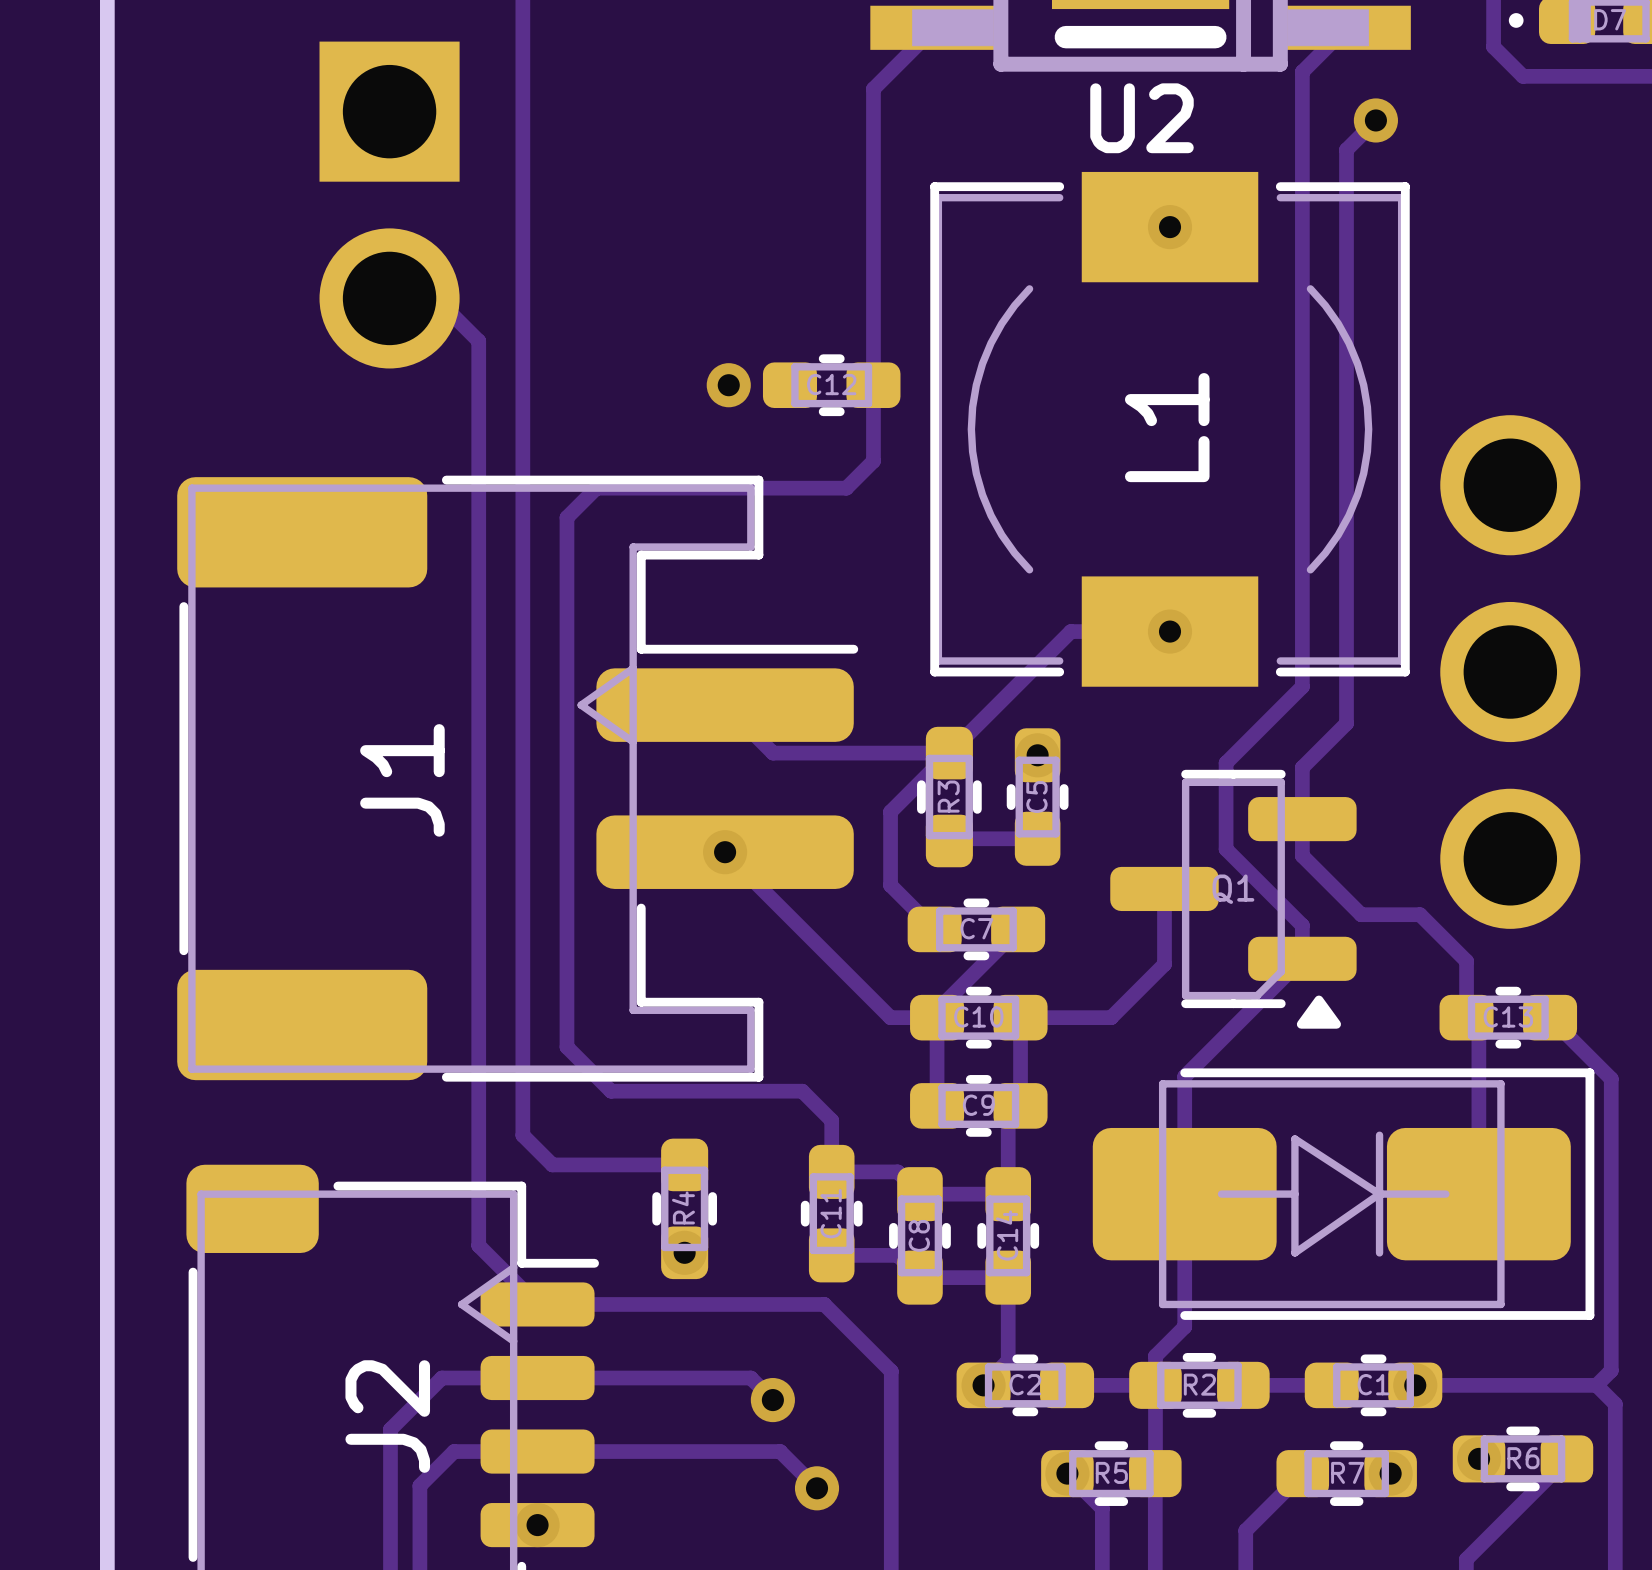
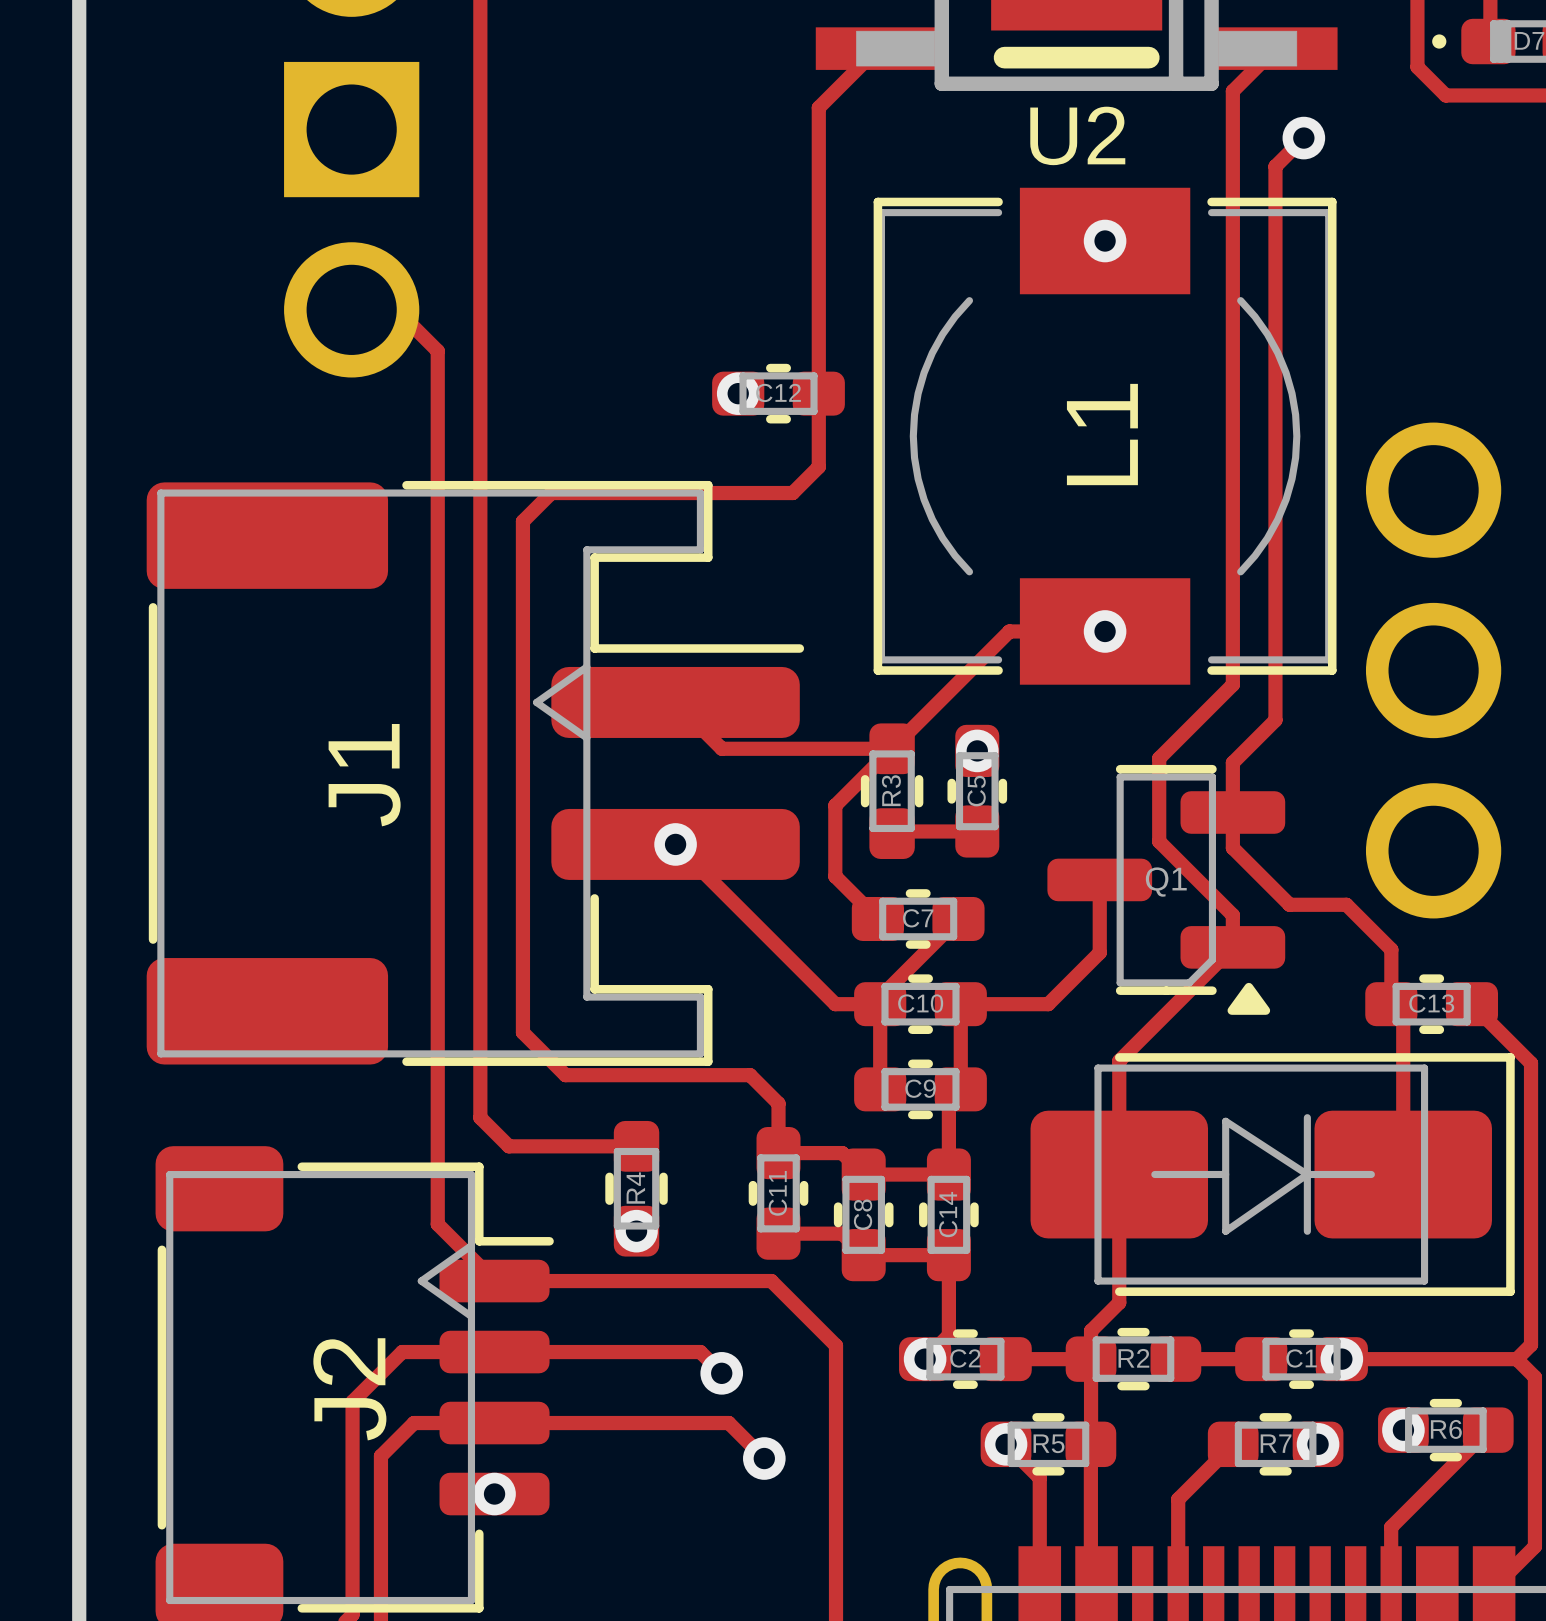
via position: (728, 385) -> (738, 393)

